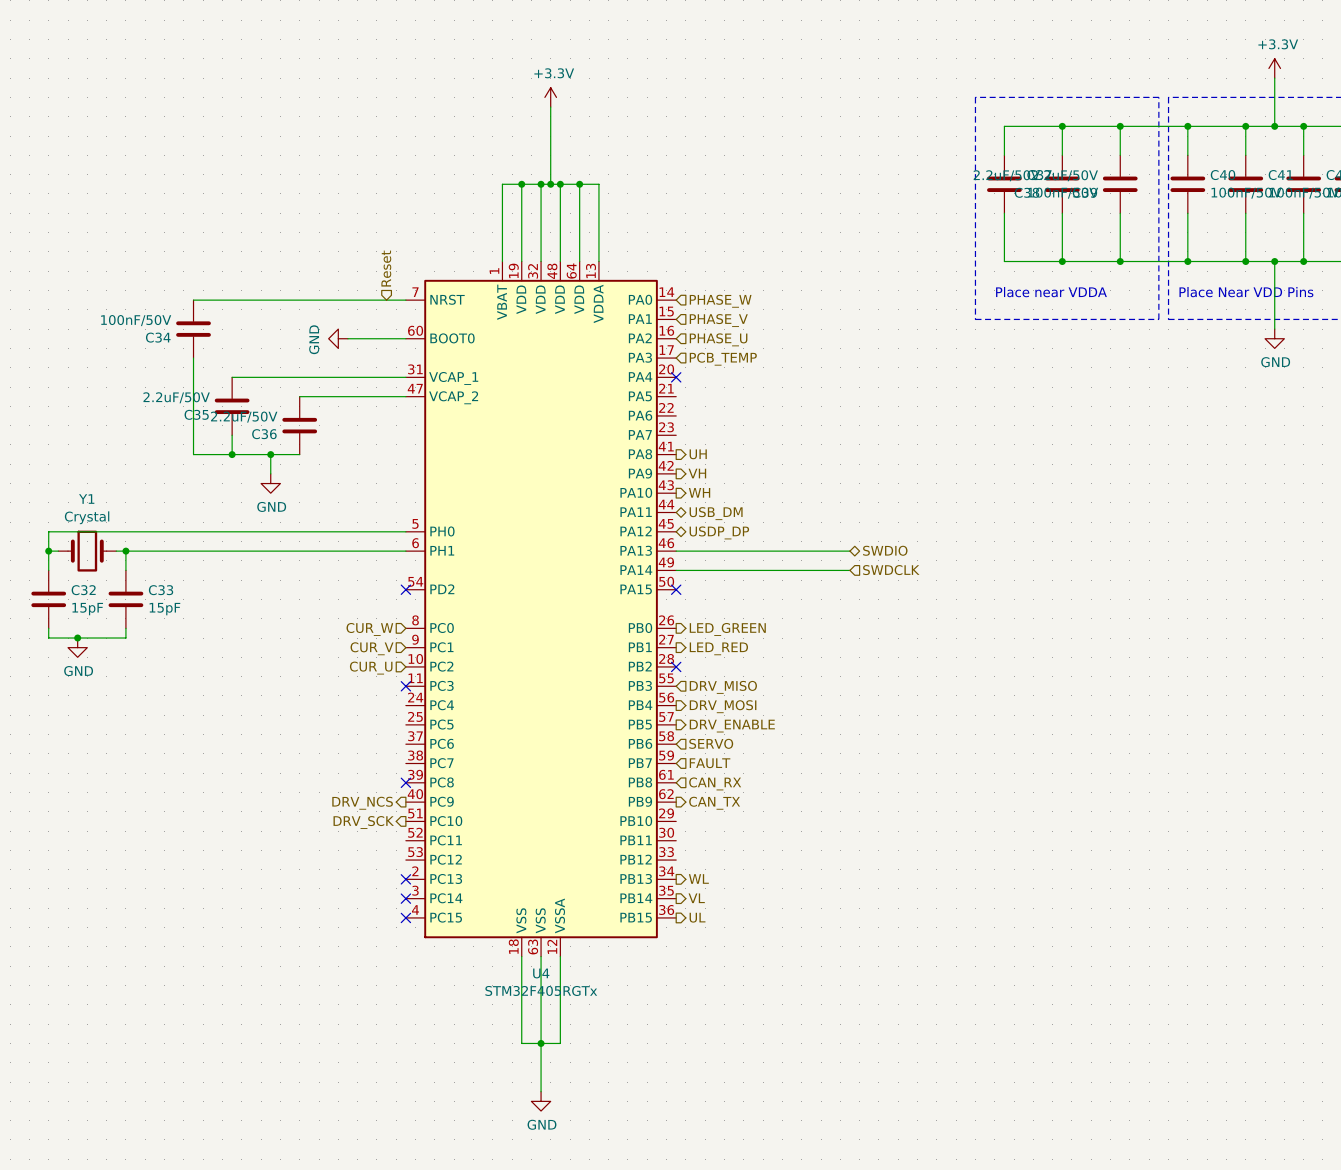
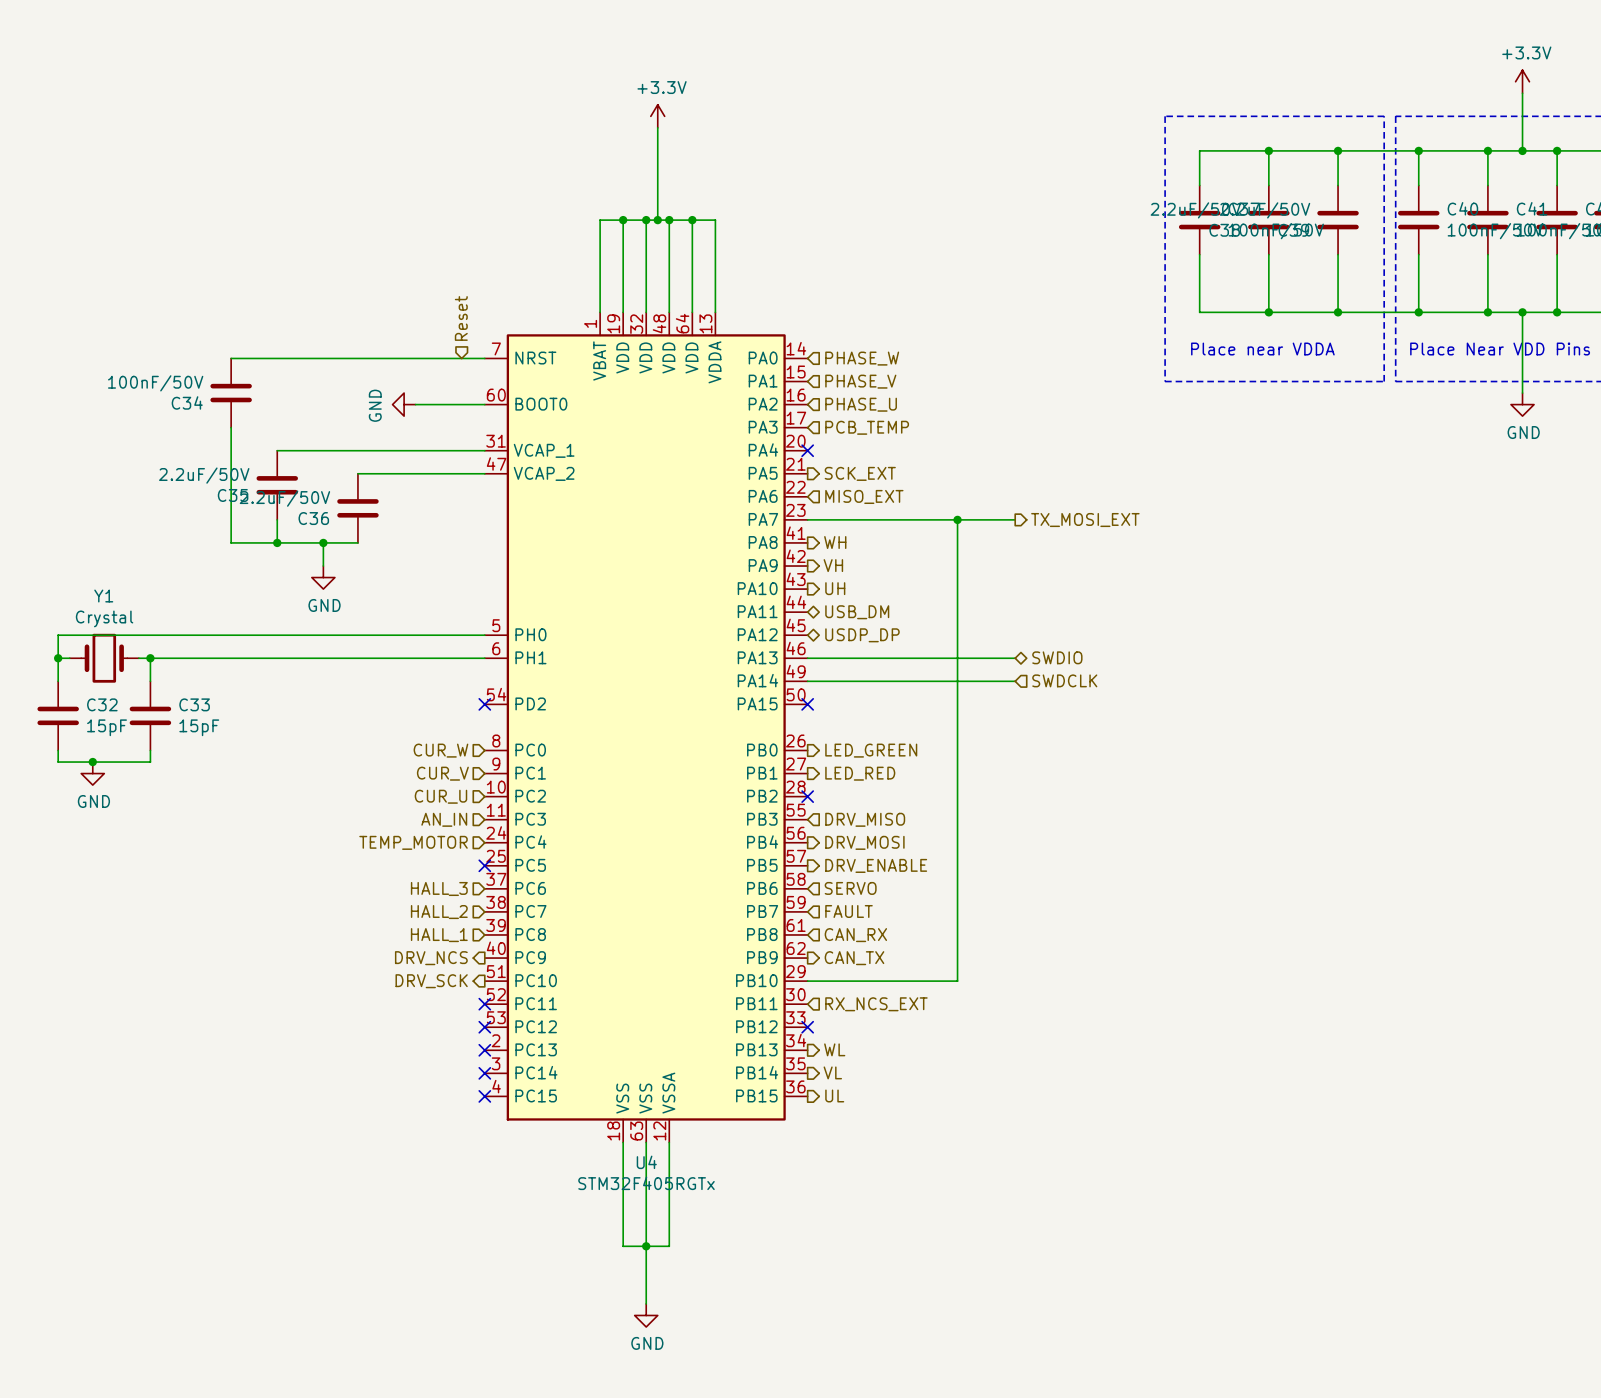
hierarchical label: none -> SCK_EXT (860, 473)
hierarchical label: none -> MISO_EXT (864, 496)
wire: none -> (807, 519) (1015, 519)
wire: none -> (957, 519) (957, 981) (807, 981)
junction: none -> (957, 519)
hierarchical label: none -> TX_MOSI_EXT (1085, 520)
hierarchical label: UH (698, 454) -> WH (835, 542)
hierarchical label: WH (699, 492) -> UH (835, 588)
no-connect mark: (405, 686) -> none
hierarchical label: none -> AN_IN (444, 819)
hierarchical label: none -> TEMP_MOTOR (413, 842)
no-connect mark: none -> (484, 865)
hierarchical label: none -> HALL_3 (439, 888)
hierarchical label: none -> HALL_2 (439, 912)
no-connect mark: (405, 782) -> none
hierarchical label: none -> HALL_1 (439, 935)
no-connect mark: none -> (484, 1004)
hierarchical label: none -> RX_NCS_EXT (876, 1004)
no-connect mark: none -> (484, 1027)
no-connect mark: none -> (807, 1027)

